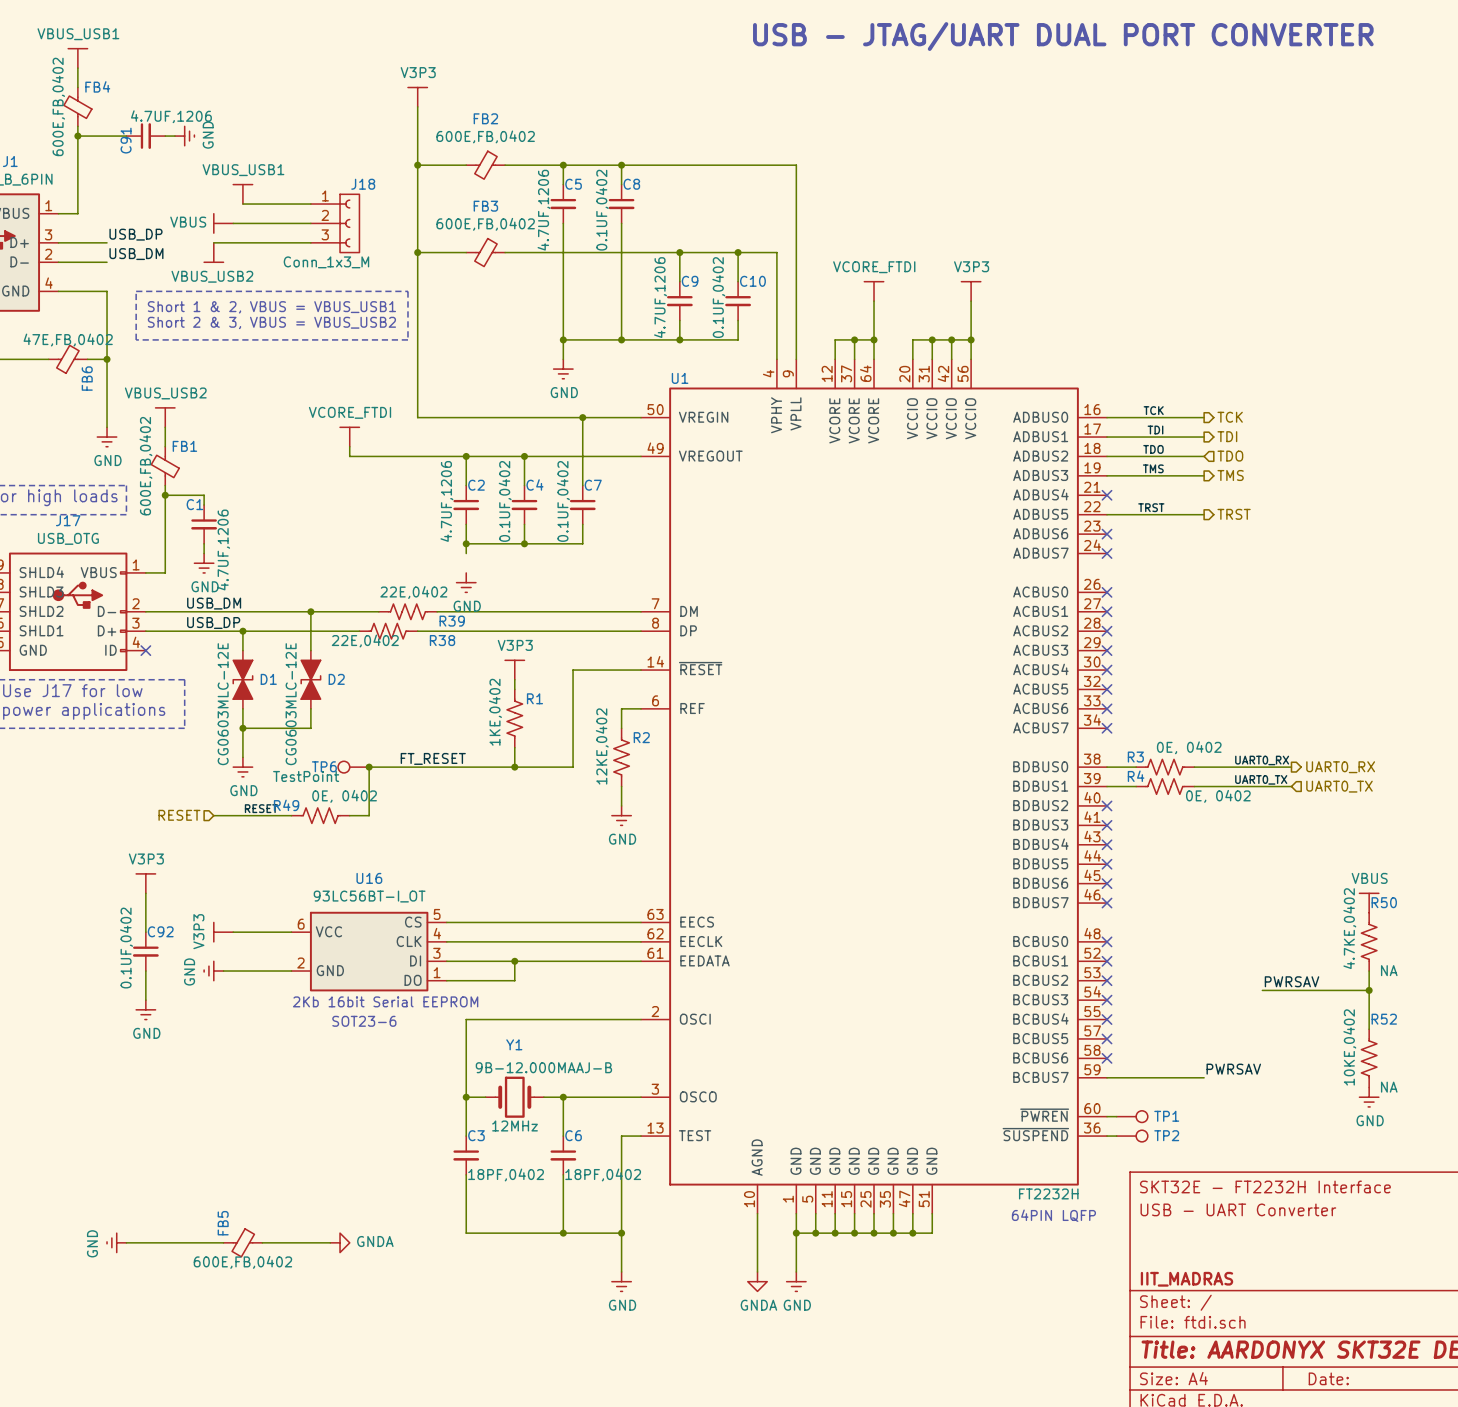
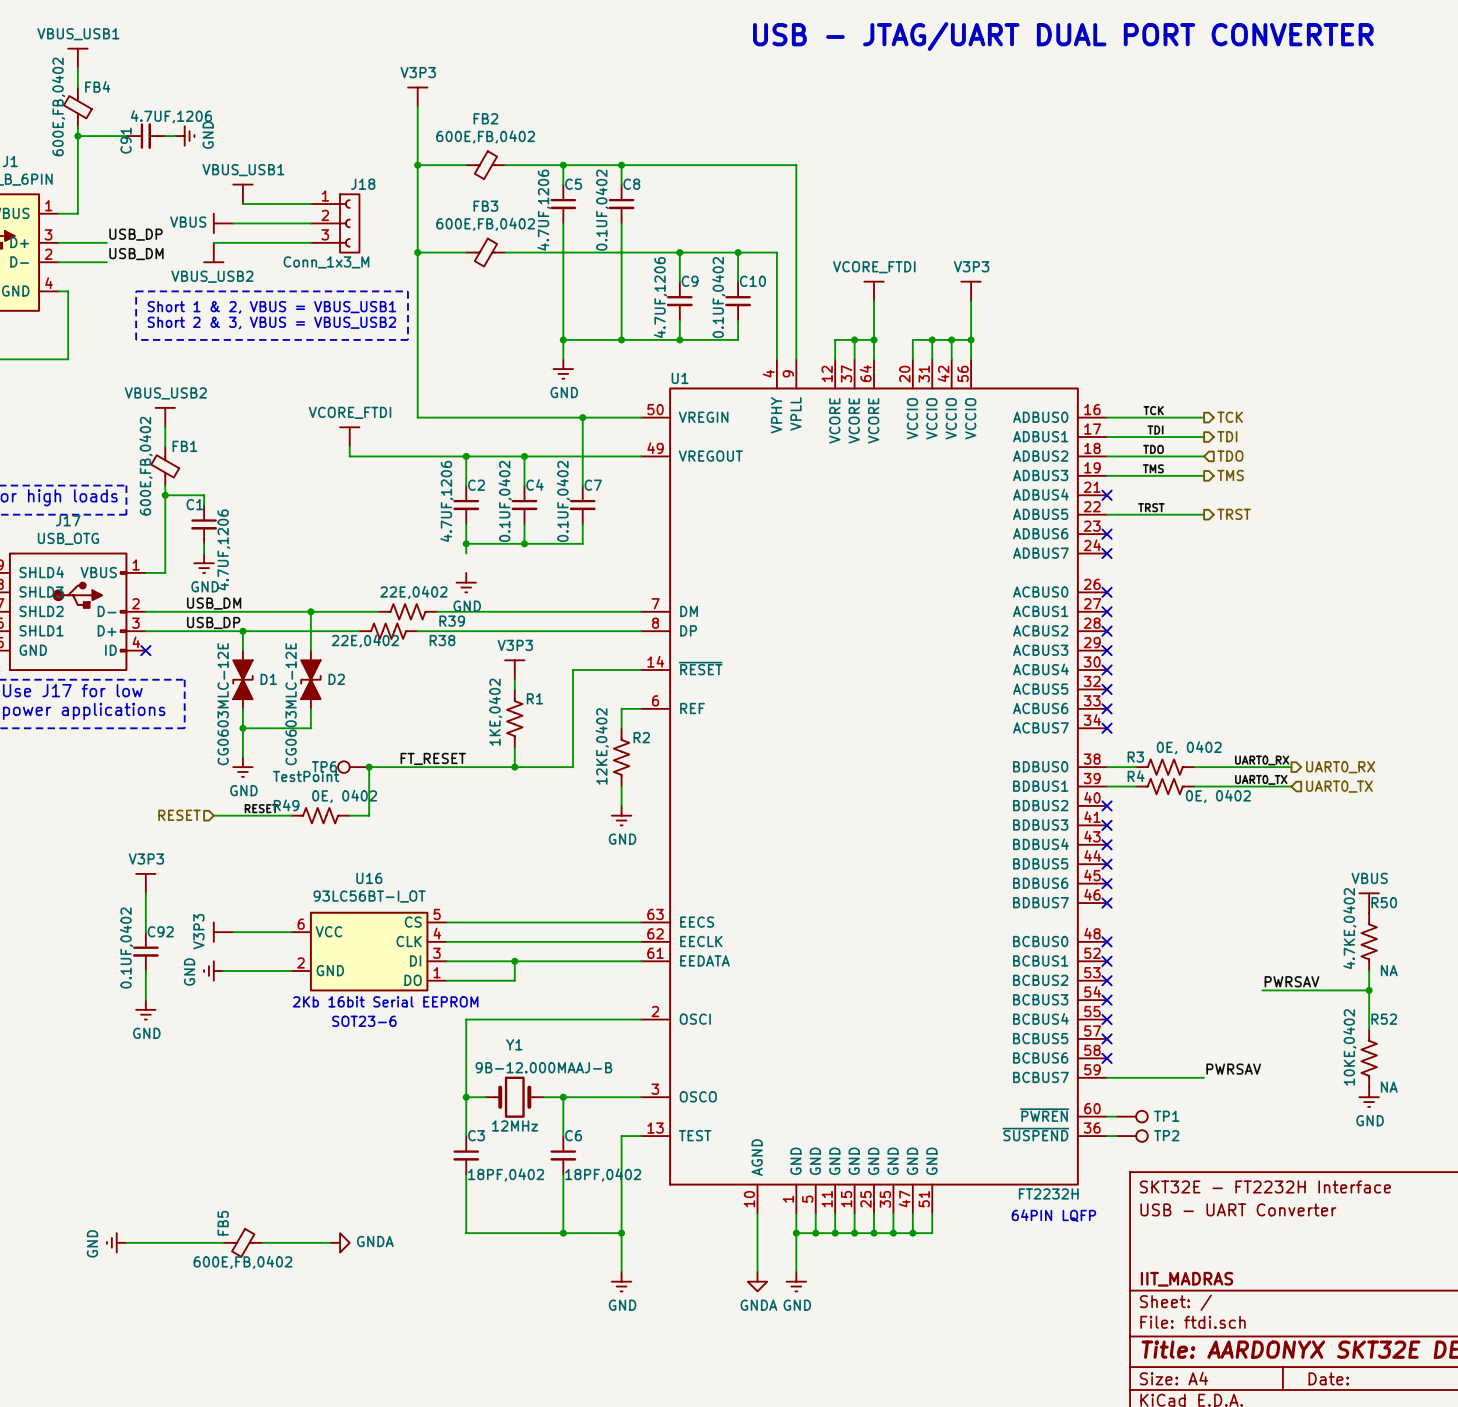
wire: (68, 291) (107, 291) (107, 427) -> (68, 291) (68, 359) (48, 359)
FB6: 47E,FB,0402 (68, 359) -> none
wire: (87, 359) (107, 359) -> none
junction: (107, 359) -> none
power symbol: GND (107, 437) -> none

